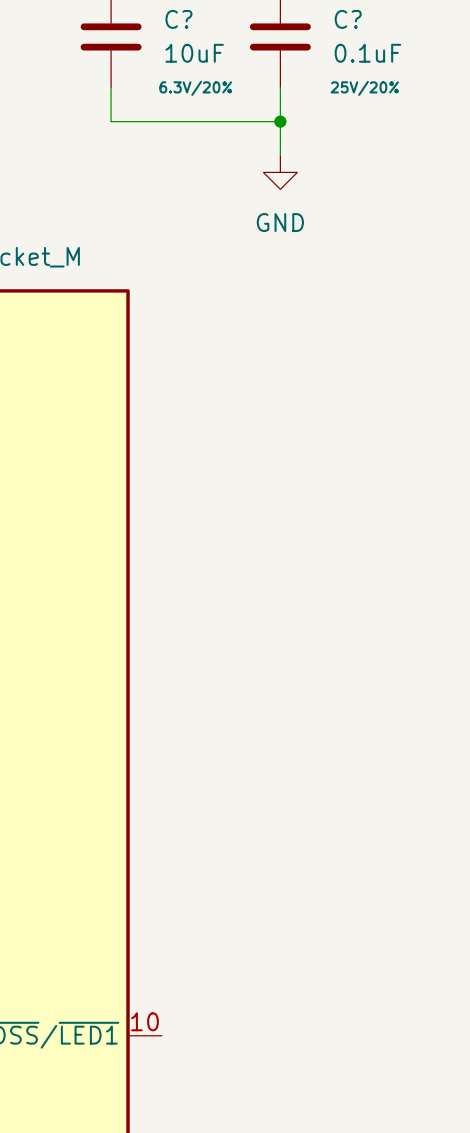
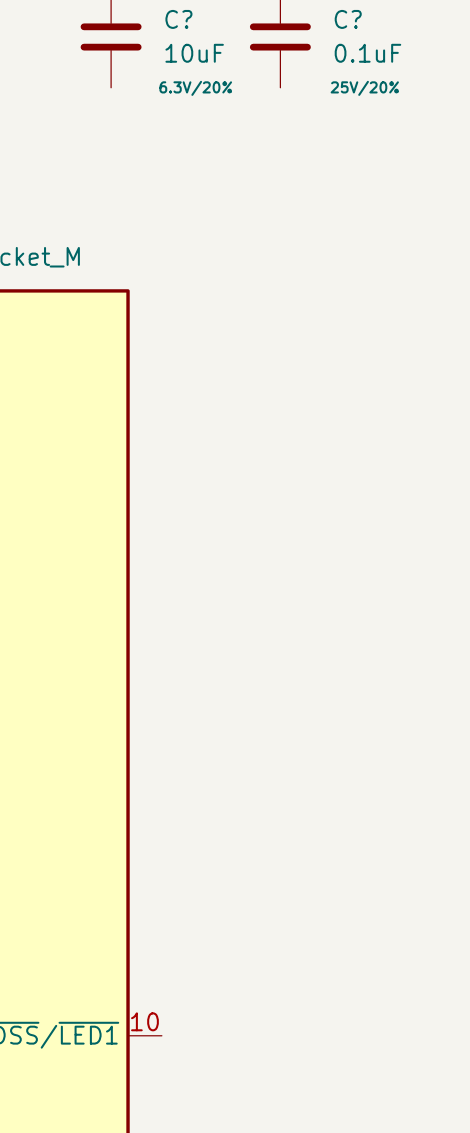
wire: (111, 87) (111, 121) (280, 121) -> none
wire: (280, 87) (280, 155) -> none
junction: (280, 121) -> none
power symbol: GND (280, 172) -> none

